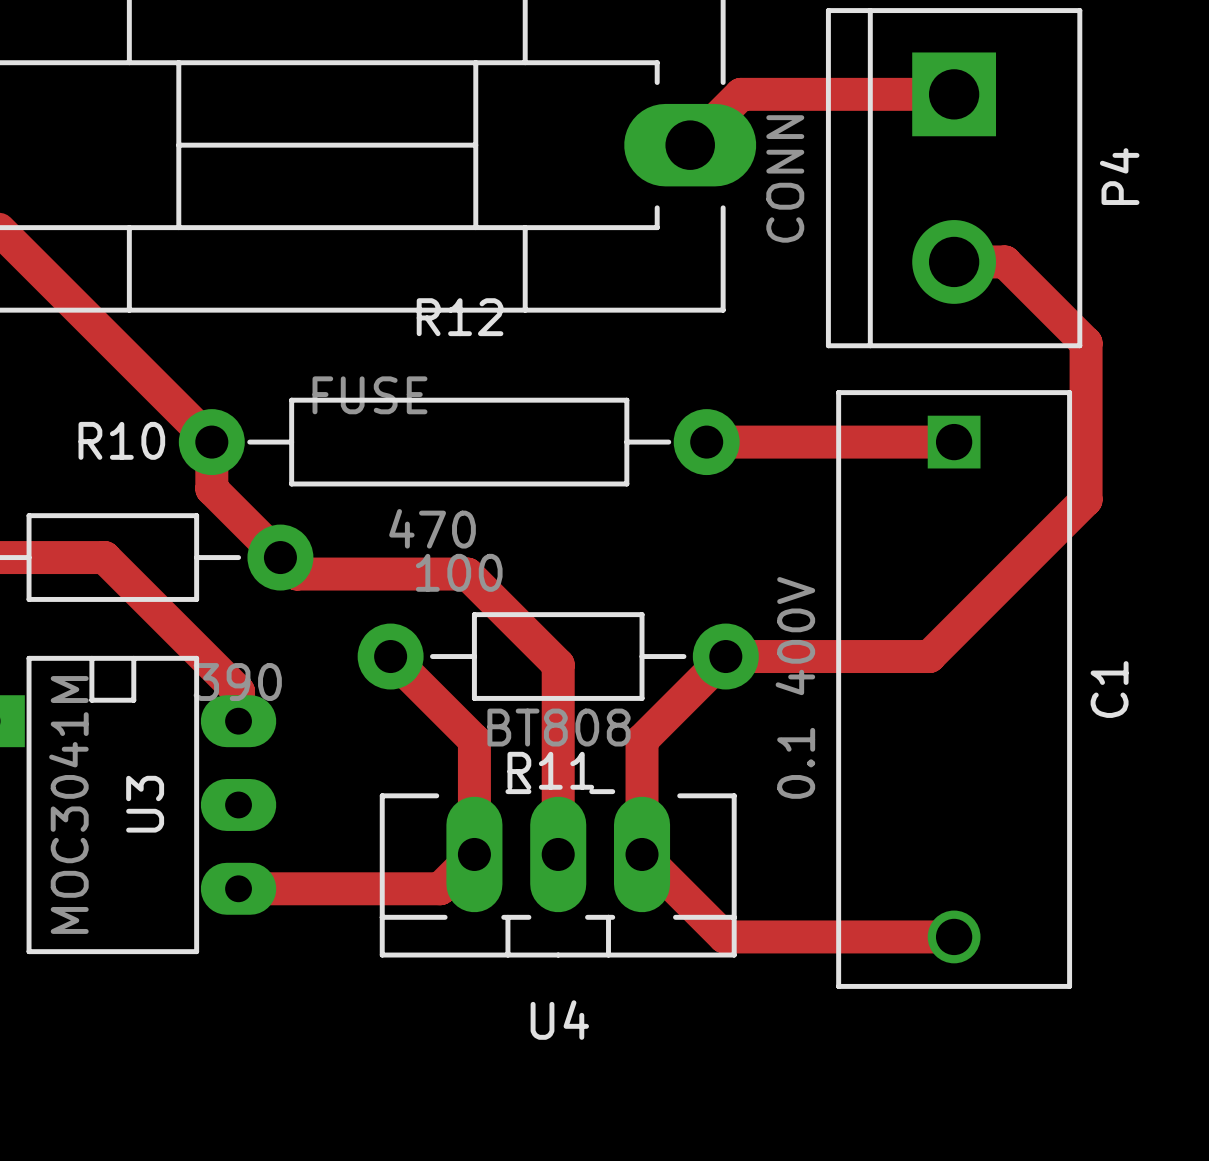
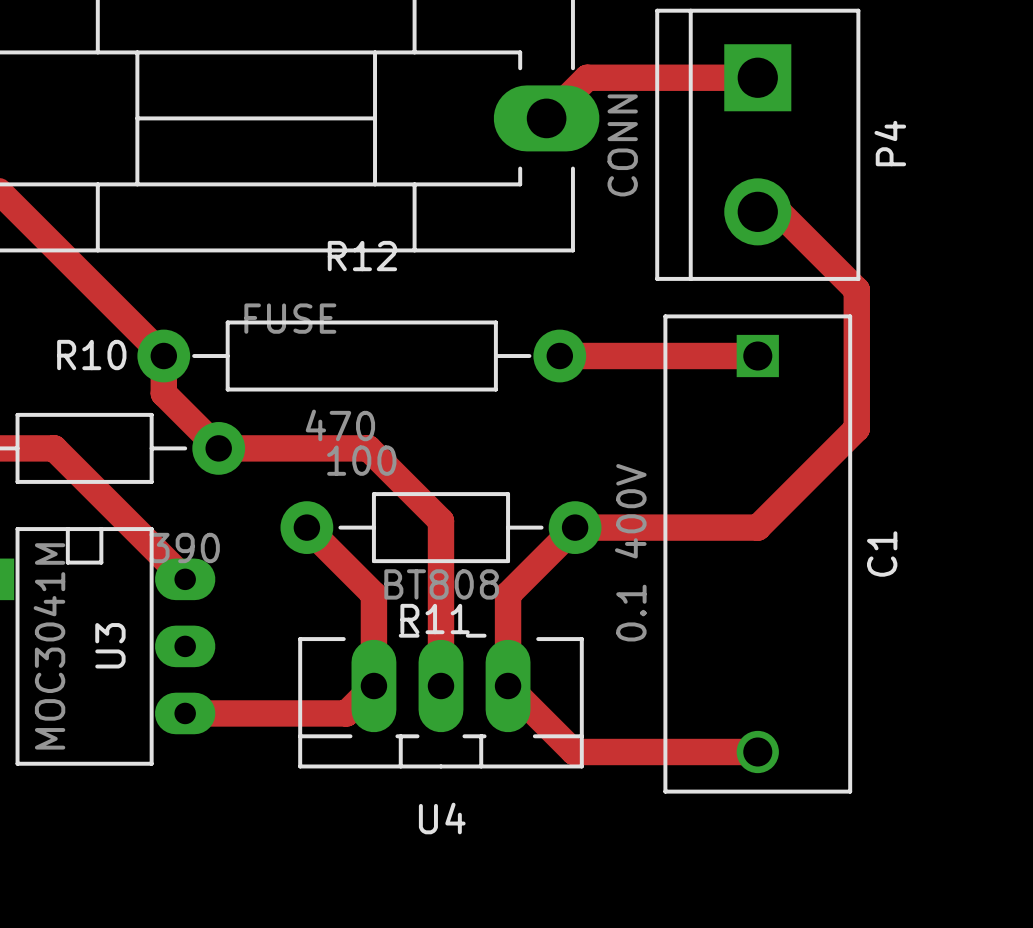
track: (980, 261) (1004, 261) (1086, 343) (1086, 499) (929, 656) -> (778, 211) (856, 290) (856, 428) (757, 527) (737, 527)
track: (74, 557) (104, 557) (238, 691) (238, 721) -> (54, 448) (185, 579)
track: (280, 557) (296, 574) (467, 574) (558, 664) -> (218, 448) (368, 448) (440, 521) (440, 534)

